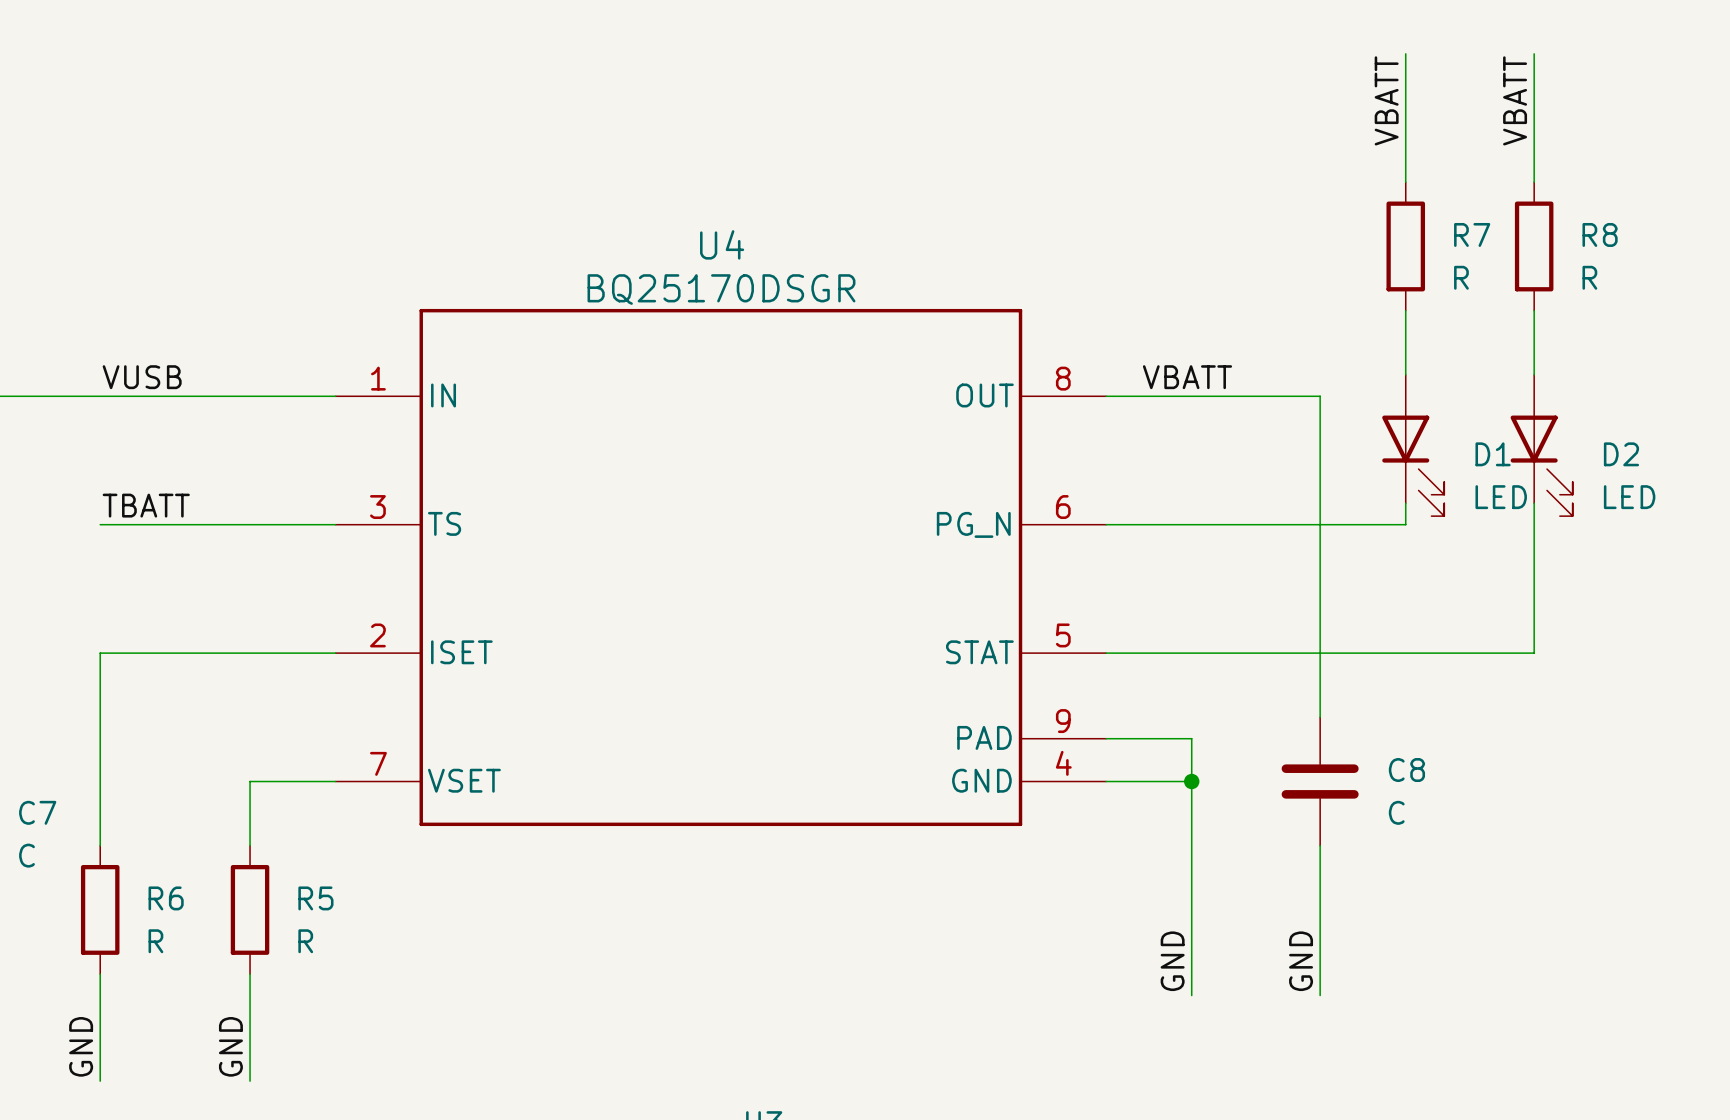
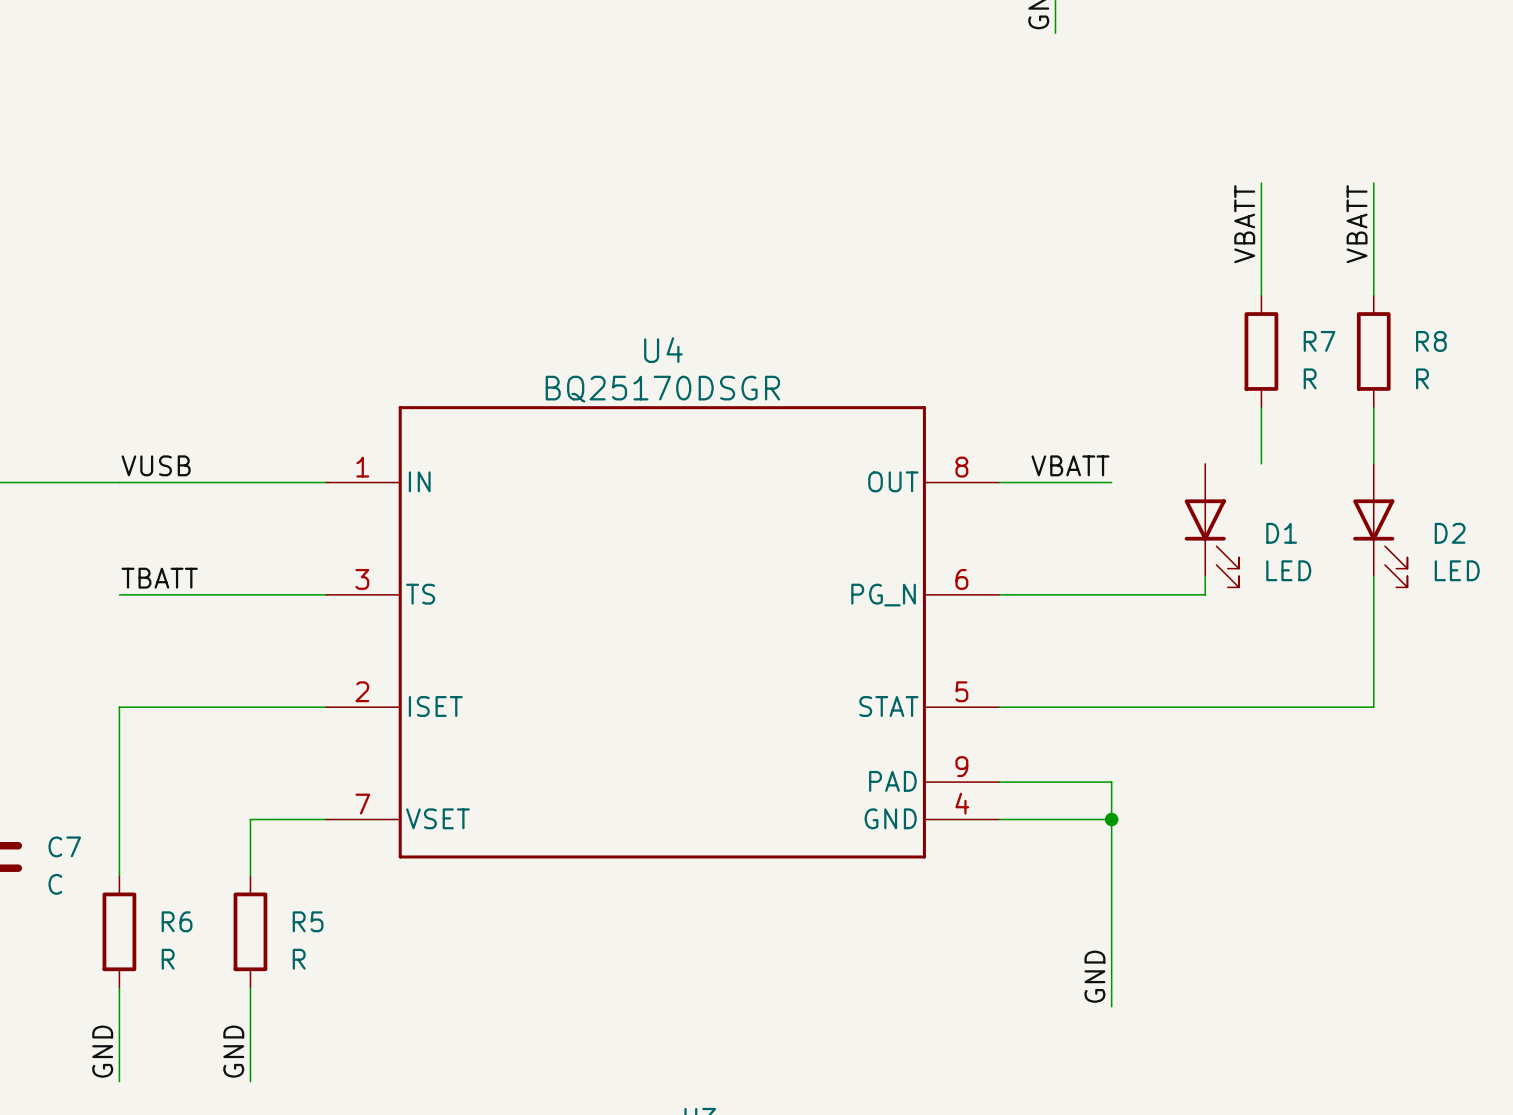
wire: (1234, 396) (1320, 396) (1320, 717) -> none
D1 position: (1413, 445) -> (1211, 525)
wire: (1405, 503) (1405, 524) (1341, 524) -> (1205, 576) (1205, 594)
wire: (1191, 738) (1191, 995) -> (1074, 782) (1111, 782) (1111, 1006)
wire: none -> (1074, 819) (1111, 819)
junction position: (1191, 781) -> (1111, 819)
C8: C (1320, 781) -> none
wire: (1320, 845) (1320, 995) -> none
label position: GND (1172, 961) -> GND (1094, 976)
label: GND (1301, 961) -> none

